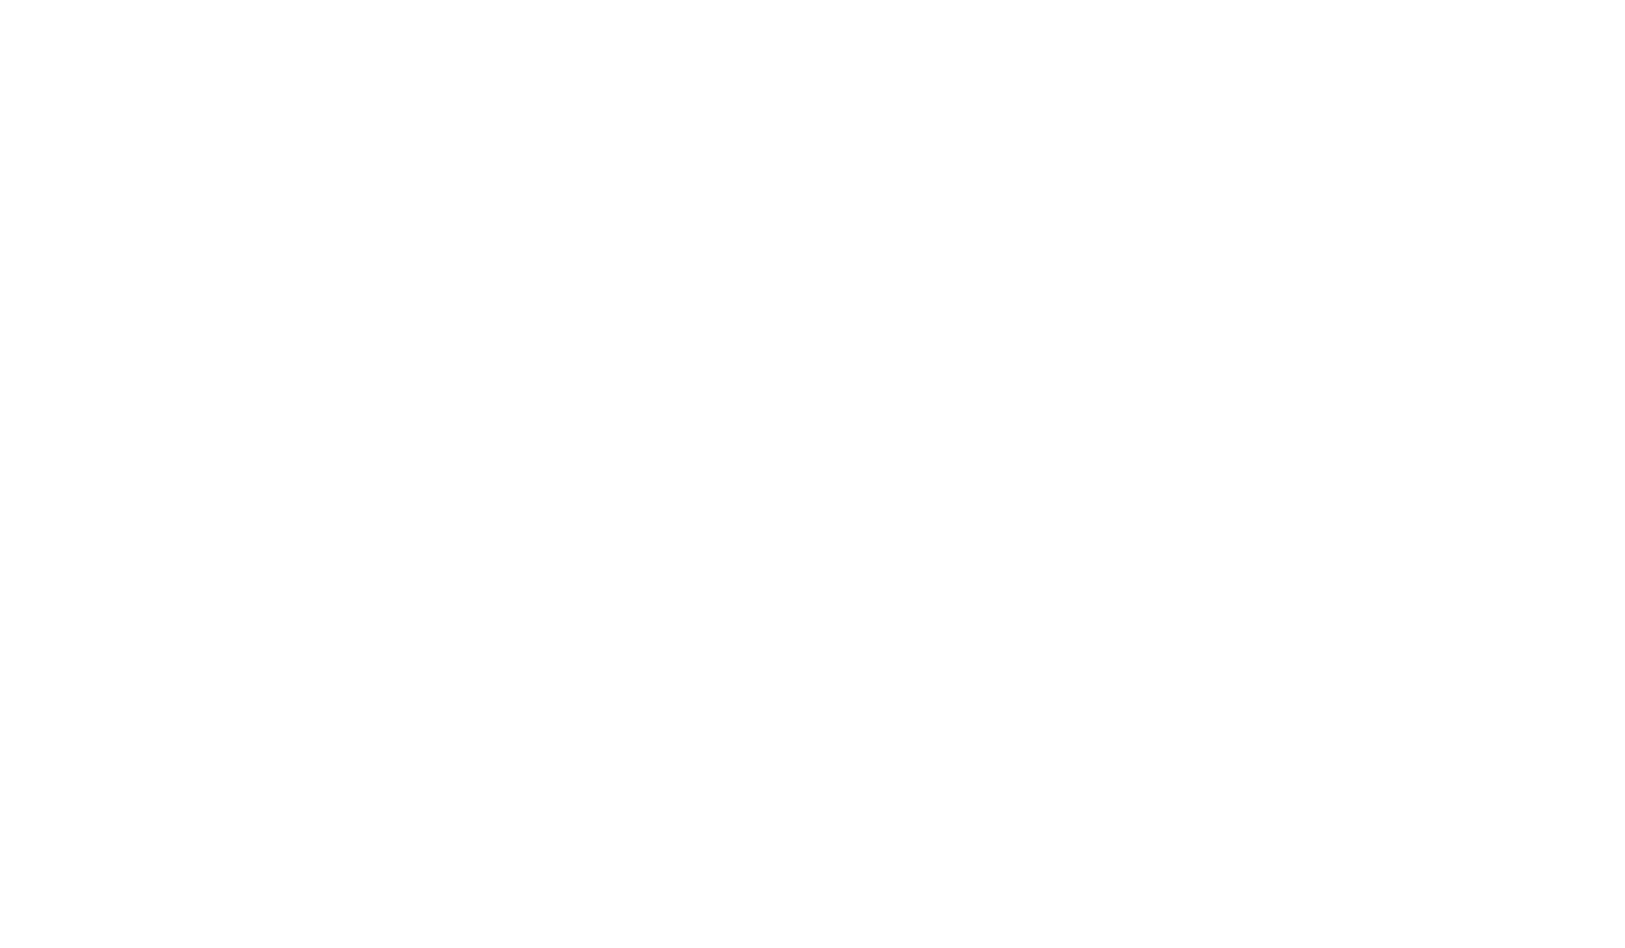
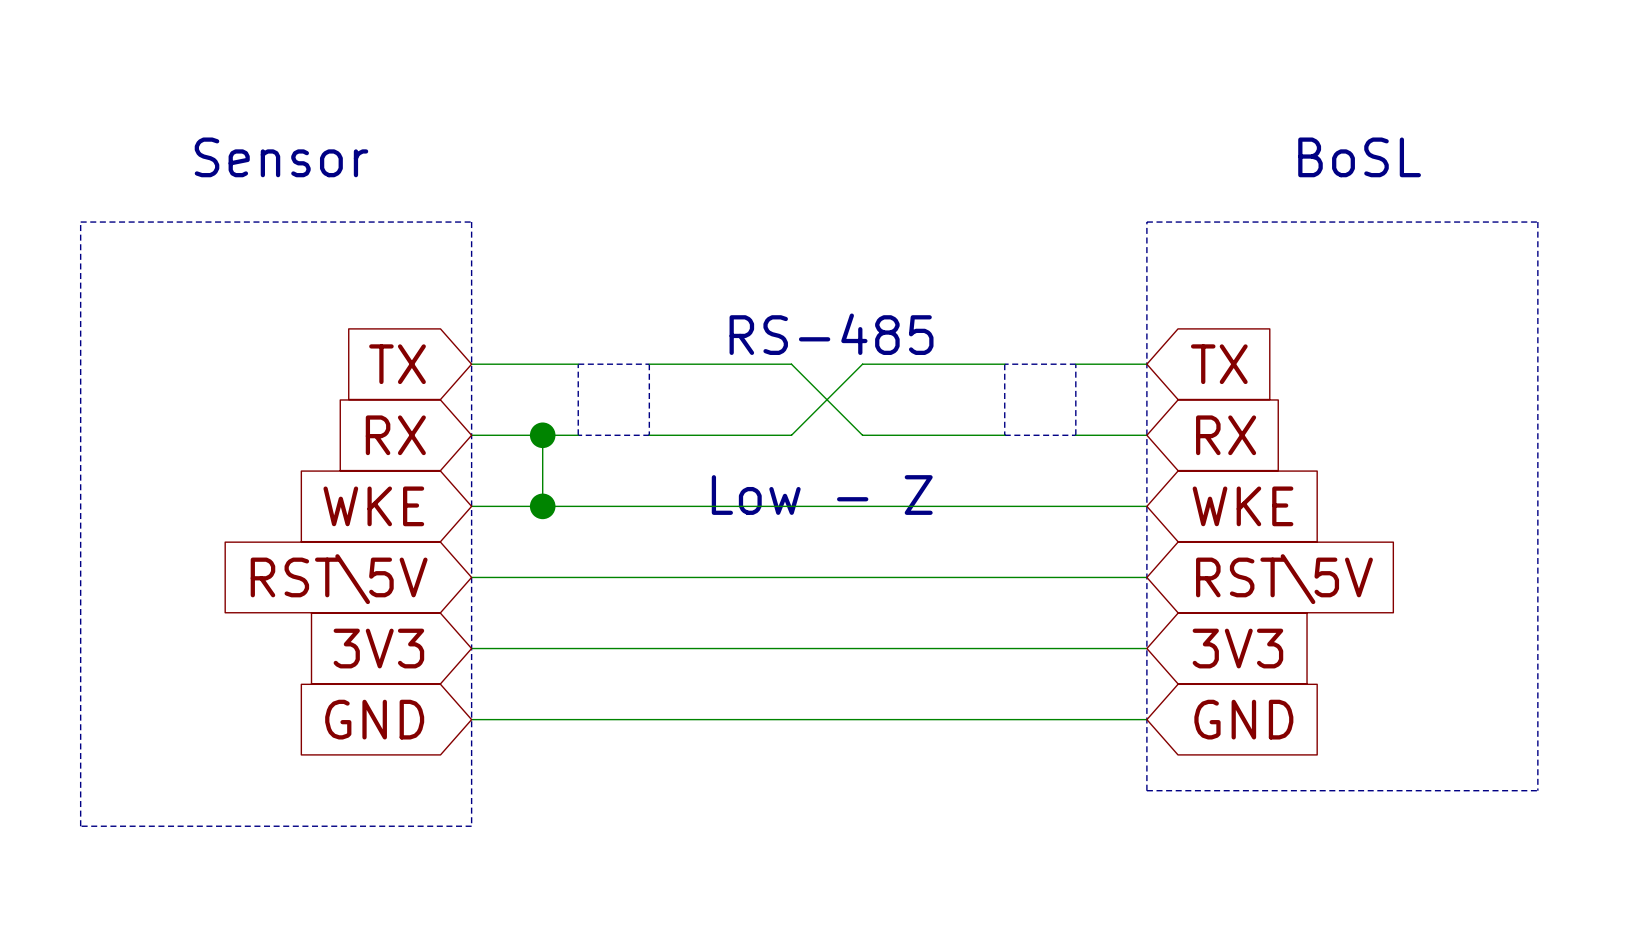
text: none -> Sensor (281, 157)
text: none -> BoSL (1359, 157)
line: none -> (80, 222) (471, 222) (471, 826) (80, 826) (80, 222)
line: none -> (1146, 222) (1537, 222) (1537, 790) (1146, 790) (1146, 222)
text: none -> RS-485 (831, 334)
global label: none -> TX (397, 364)
wire: none -> (471, 364) (578, 364)
line: none -> (578, 364) (649, 364) (649, 435) (578, 435) (578, 364)
wire: none -> (649, 364) (791, 364) (862, 435) (1004, 435)
wire: none -> (1004, 364) (862, 364) (791, 435) (649, 435)
line: none -> (1004, 364) (1004, 435) (1075, 435) (1075, 364) (1004, 364)
wire: none -> (1075, 364) (1146, 364)
global label: none -> TX (1219, 364)
global label: none -> RX (395, 435)
wire: none -> (471, 435) (578, 435)
wire: none -> (542, 435) (542, 506)
junction: none -> (542, 435)
wire: none -> (1075, 435) (1146, 435)
global label: none -> RX (1226, 435)
text: none -> Low - Z (822, 495)
global label: none -> WKE (373, 506)
wire: none -> (471, 506) (1146, 506)
junction: none -> (542, 506)
global label: none -> WKE (1243, 506)
wire: none -> (471, 577) (1146, 577)
global label: none -> RST\5V (339, 579)
global label: none -> RST\5V (1284, 579)
global label: none -> 3V3 (378, 648)
wire: none -> (471, 648) (1146, 648)
global label: none -> 3V3 (1237, 648)
global label: none -> GND (374, 719)
wire: none -> (471, 719) (1146, 719)
global label: none -> GND (1243, 719)

